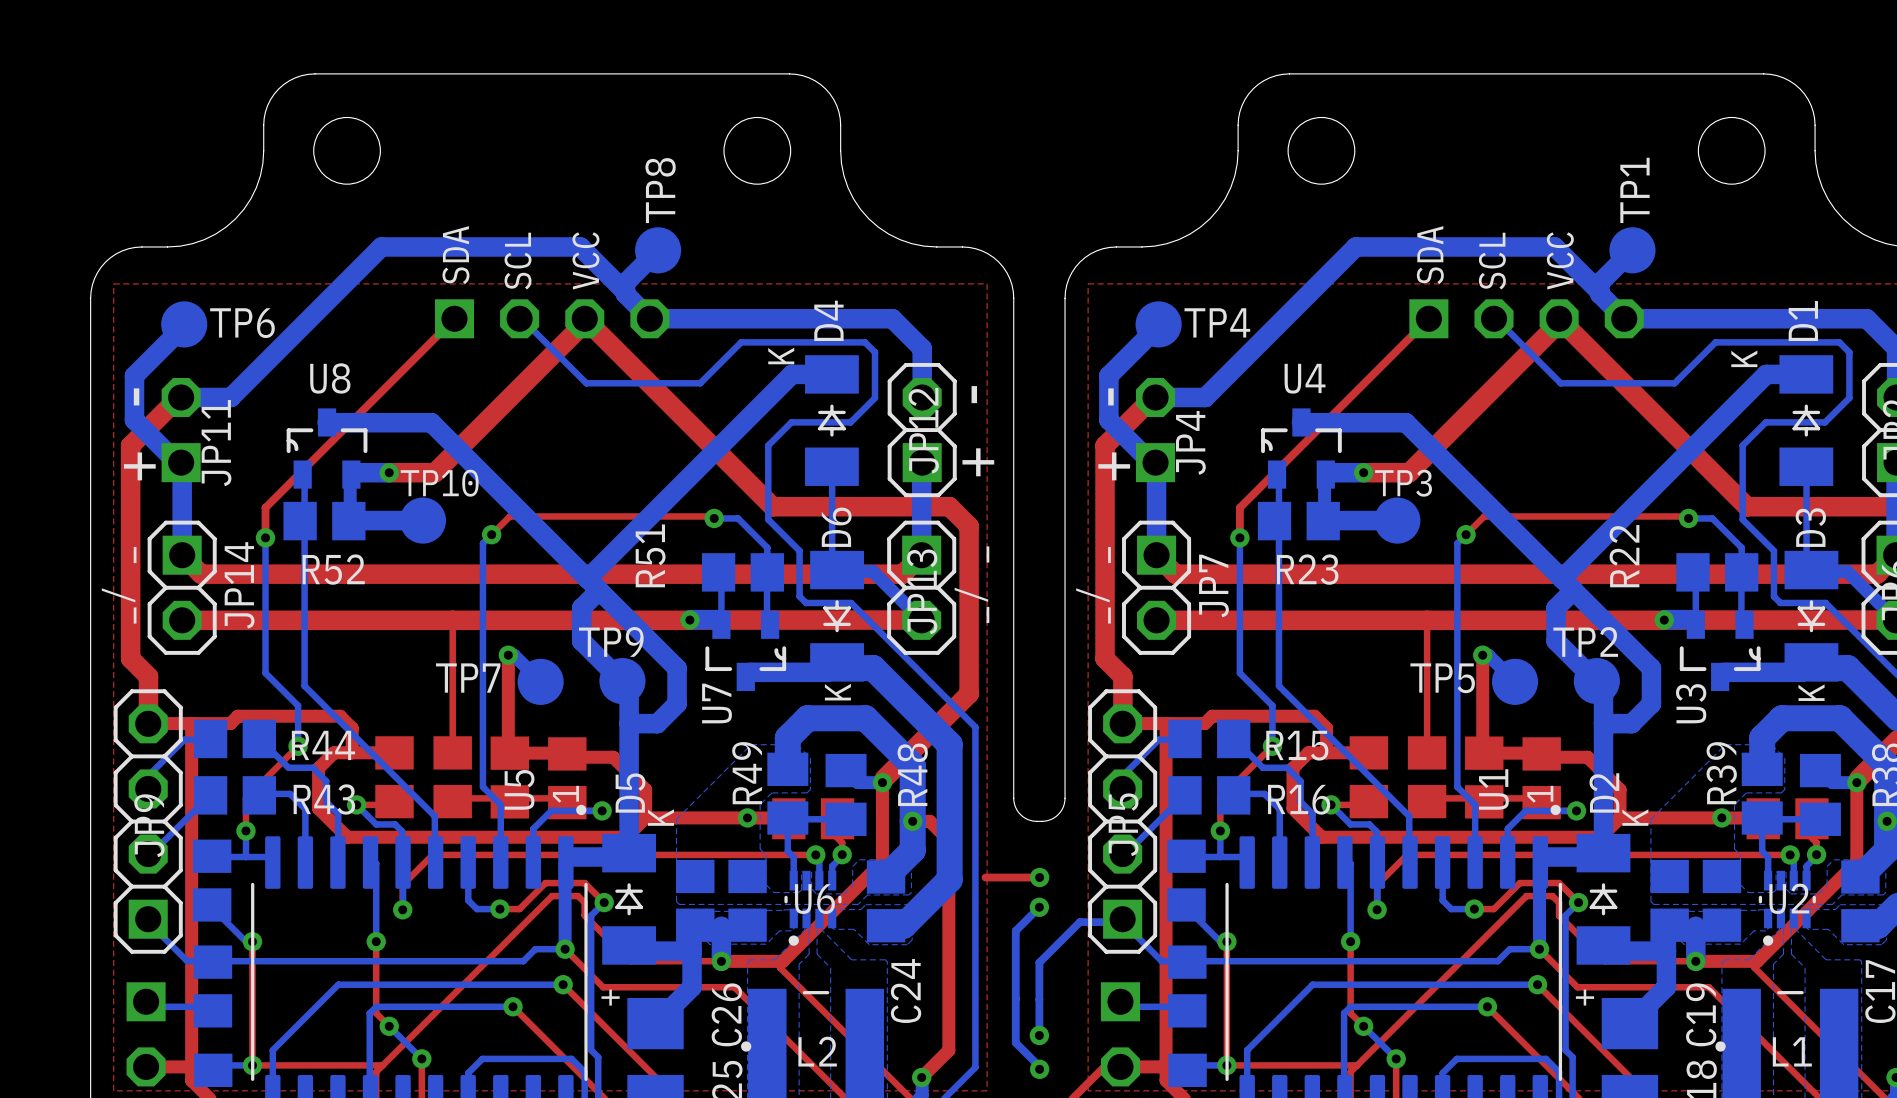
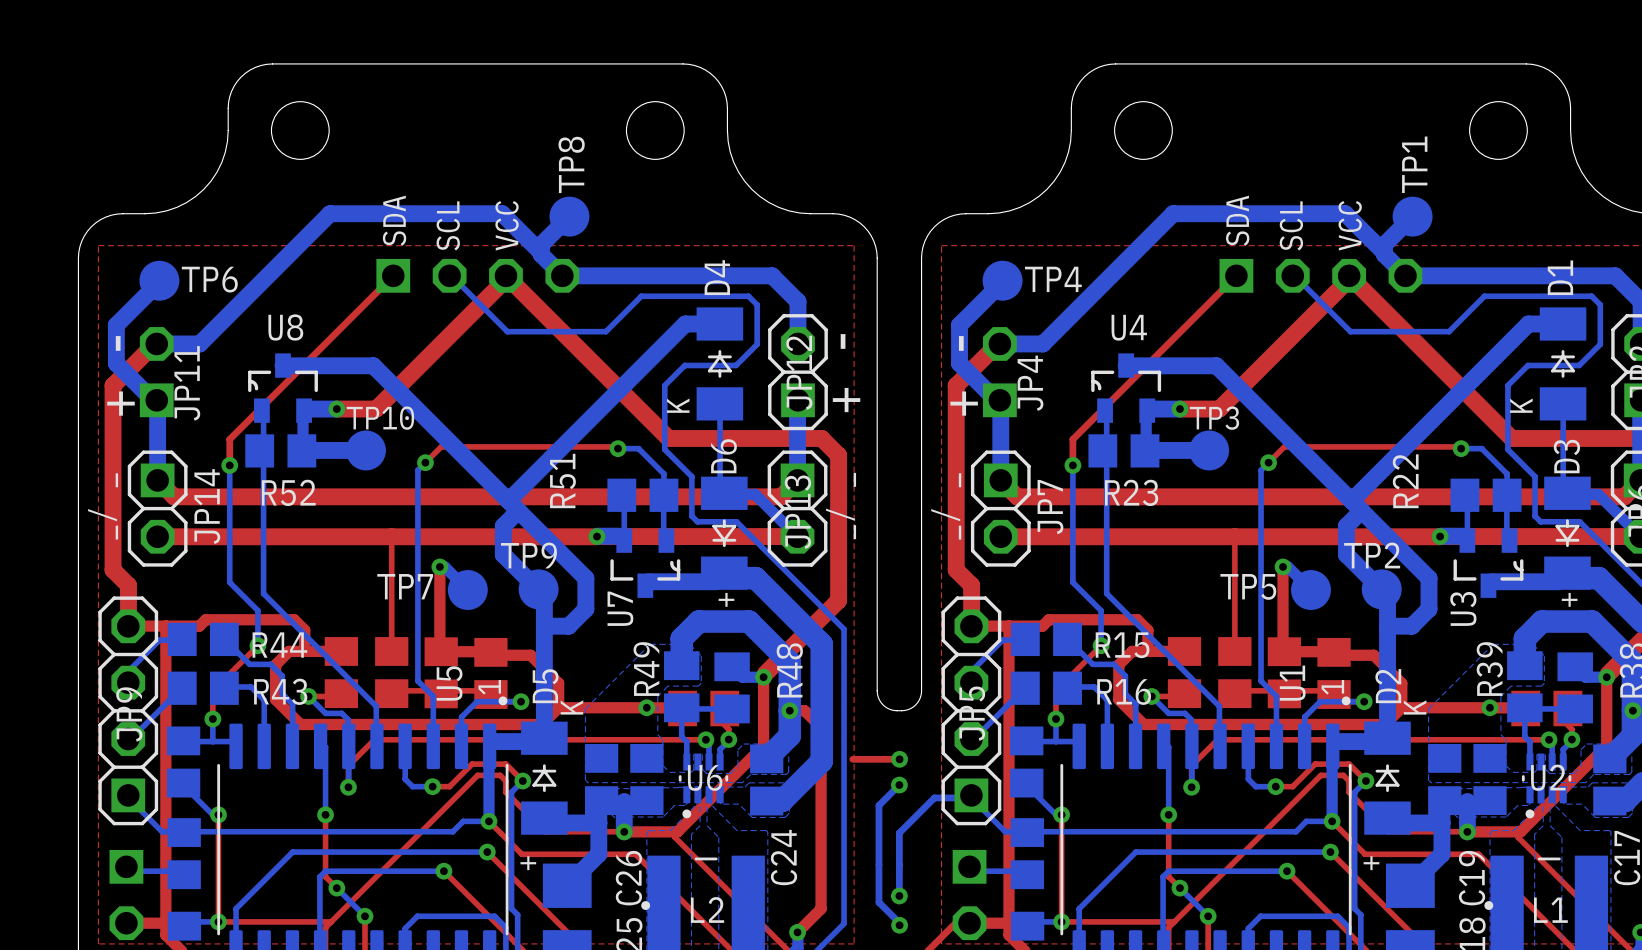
text position: K (781, 356) -> K (678, 405)
text position: K (1744, 358) -> K (1521, 405)
text: K (837, 692) -> + (726, 599)
text: K (1811, 692) -> + (1569, 599)

